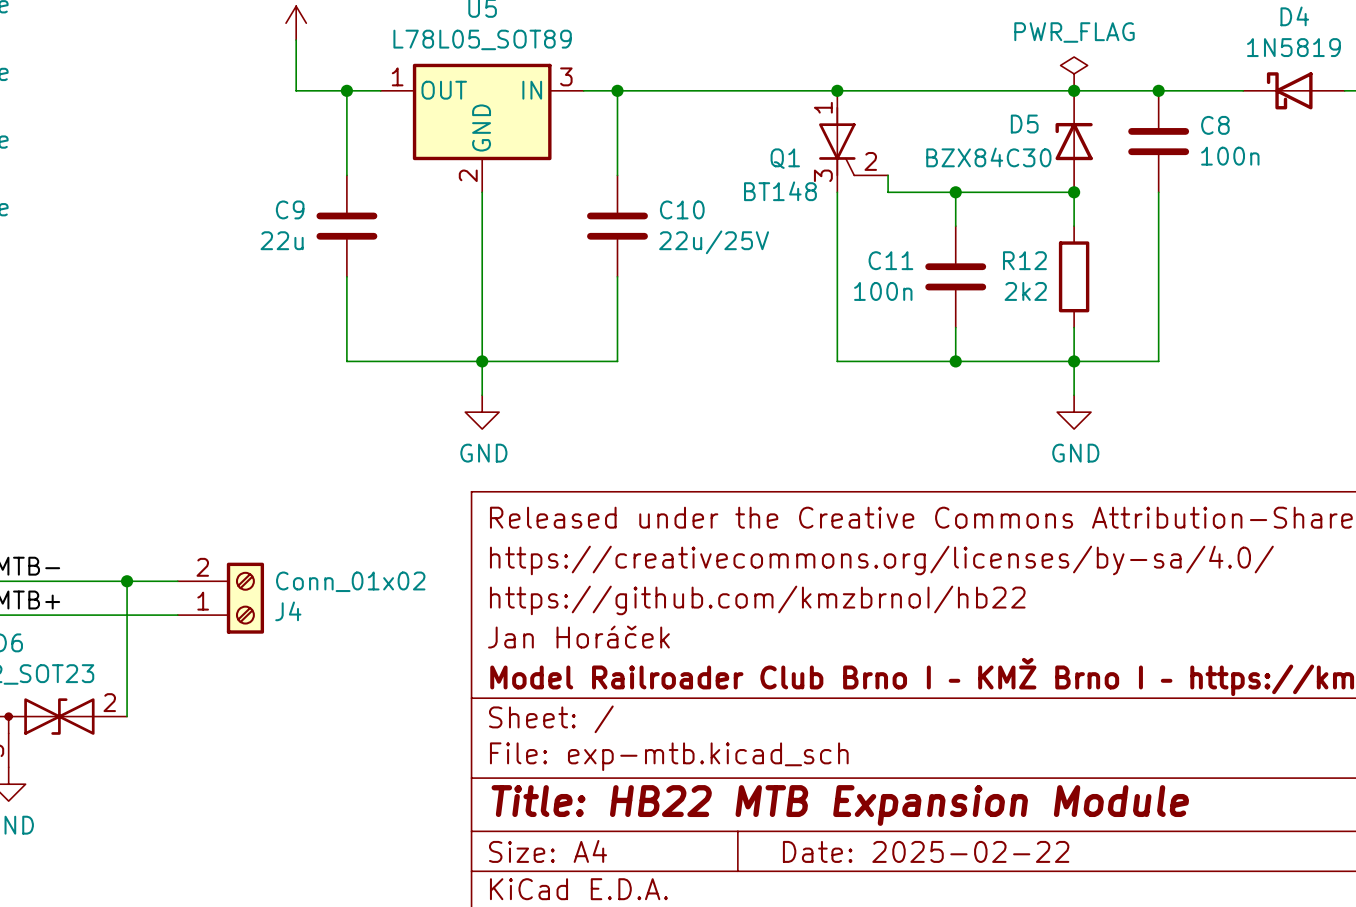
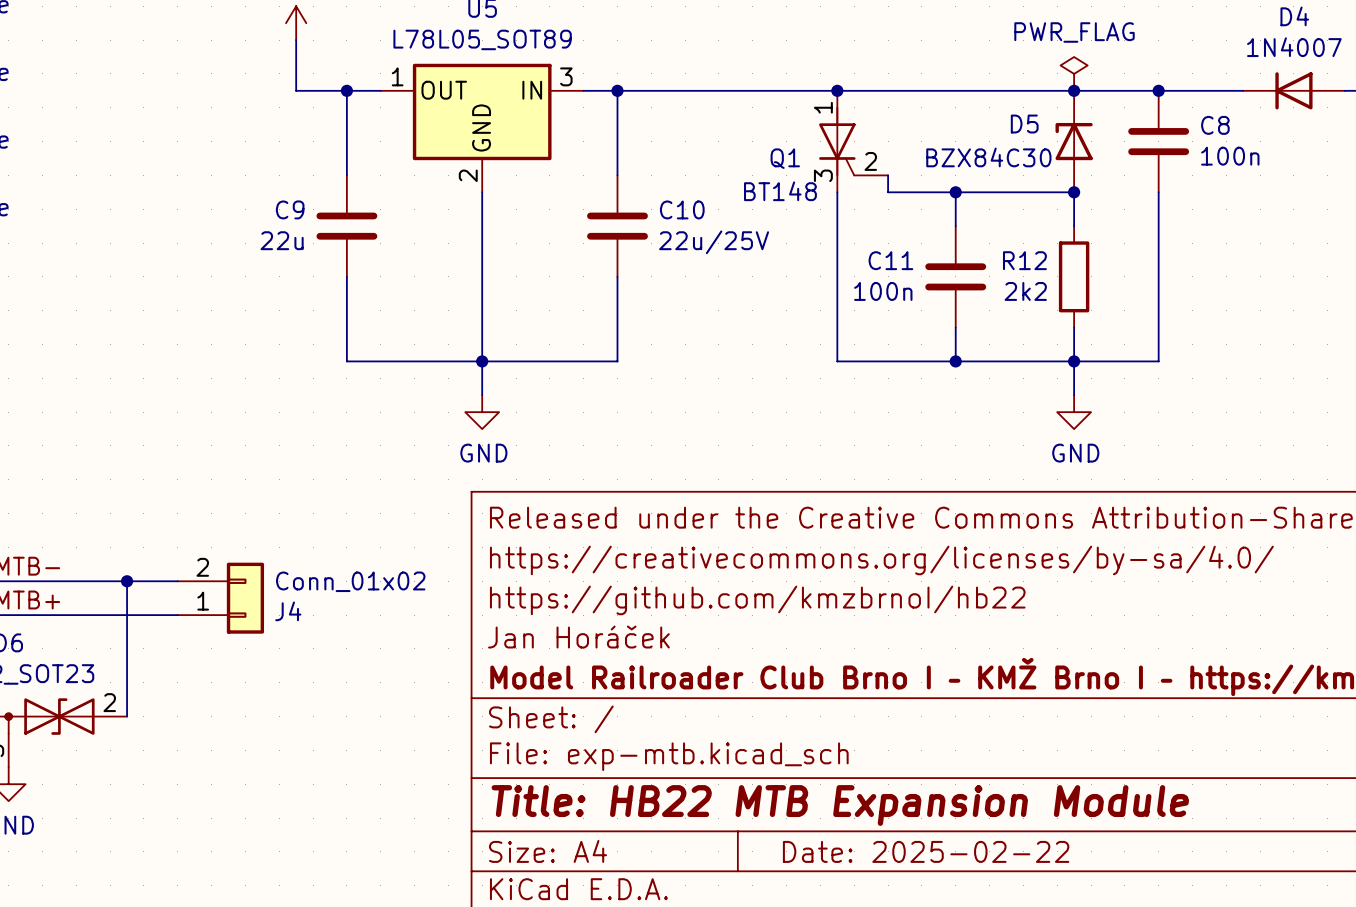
D4 value: 1N5819 (1293, 47) -> 1N4007 (1294, 47)
D4 symbol: [1243, 72, 1345, 110] -> [1243, 72, 1345, 110]
J4 symbol: [177, 562, 265, 634] -> [177, 562, 265, 634]

